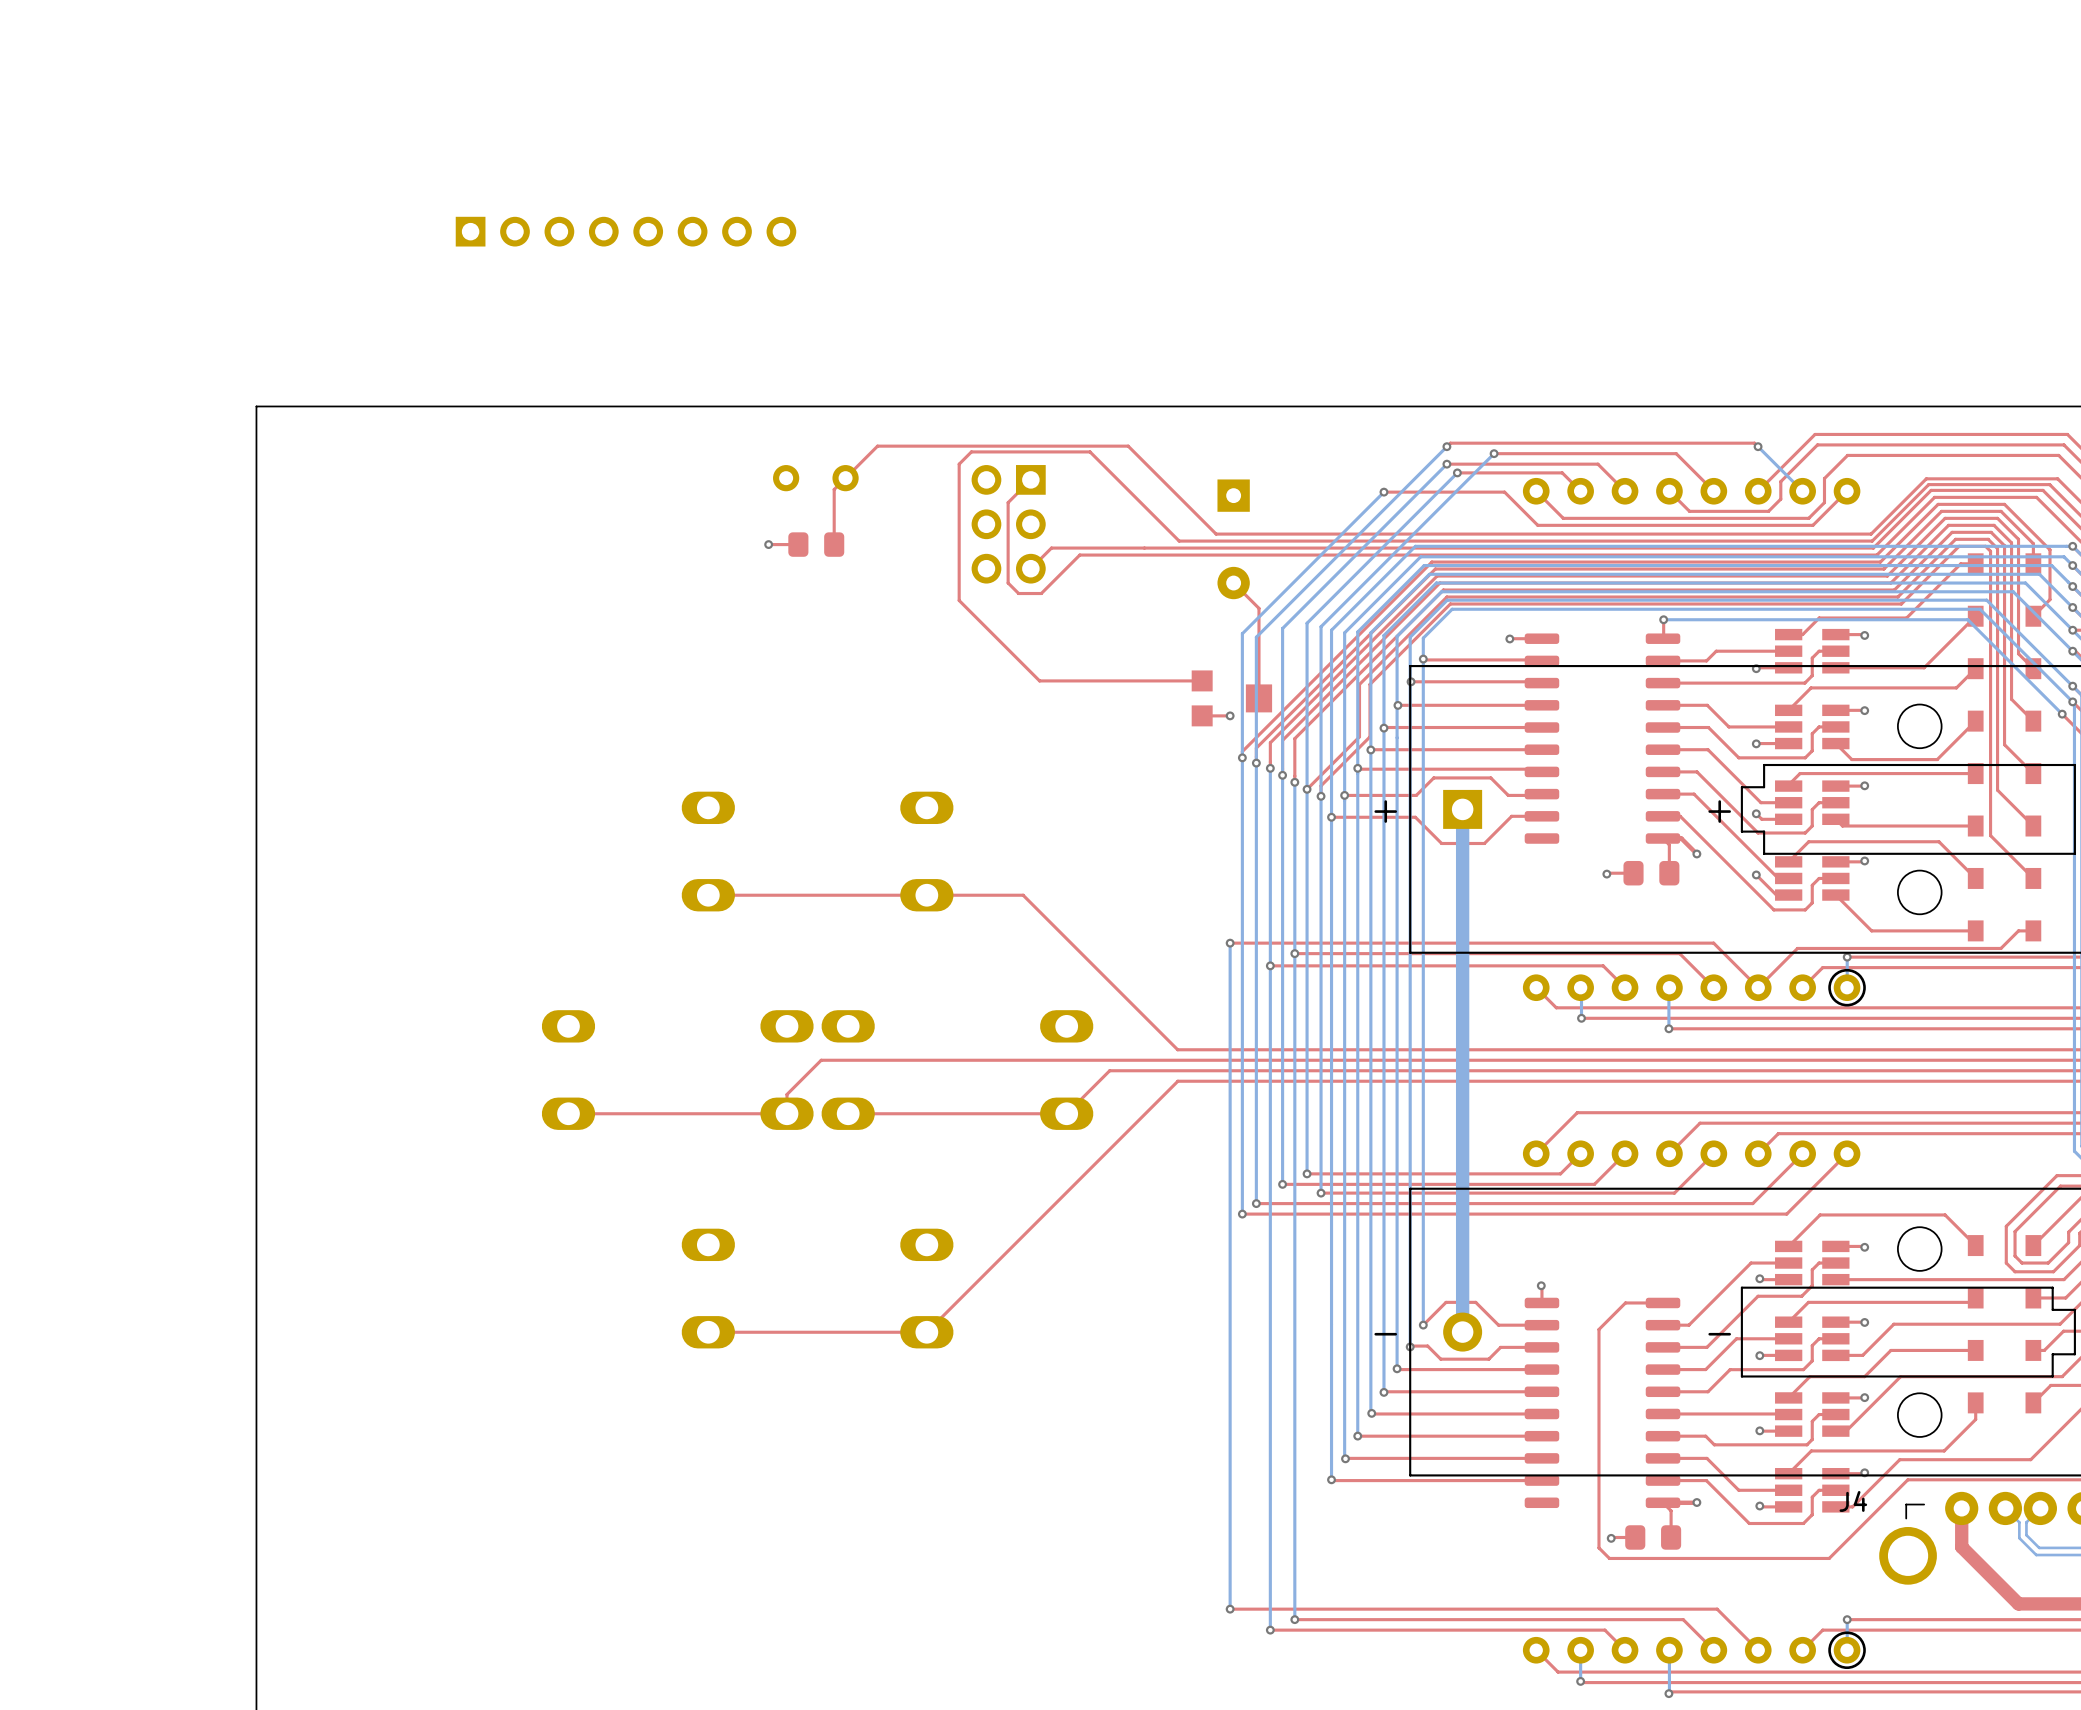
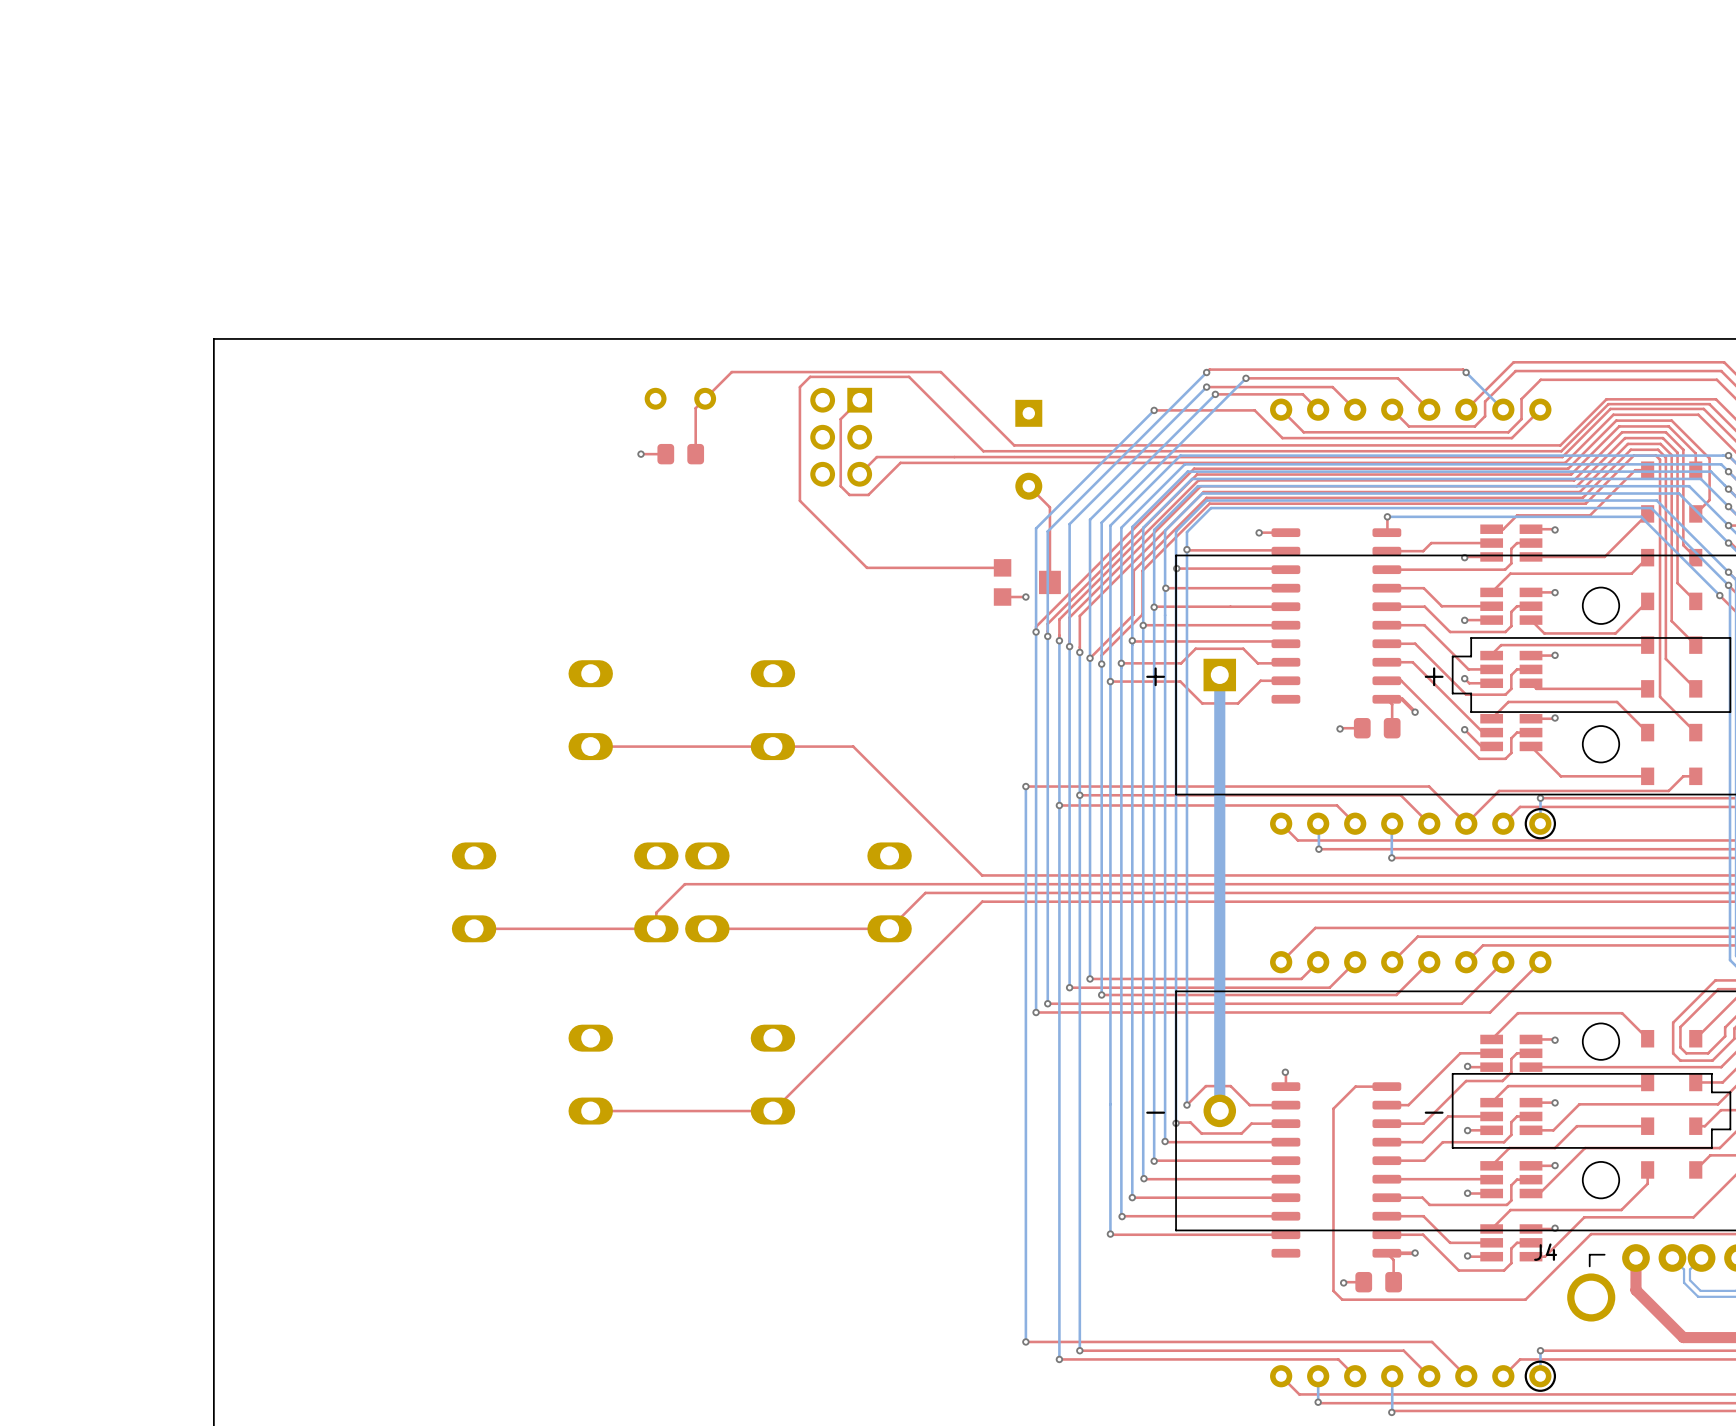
part: (626, 231) -> none

